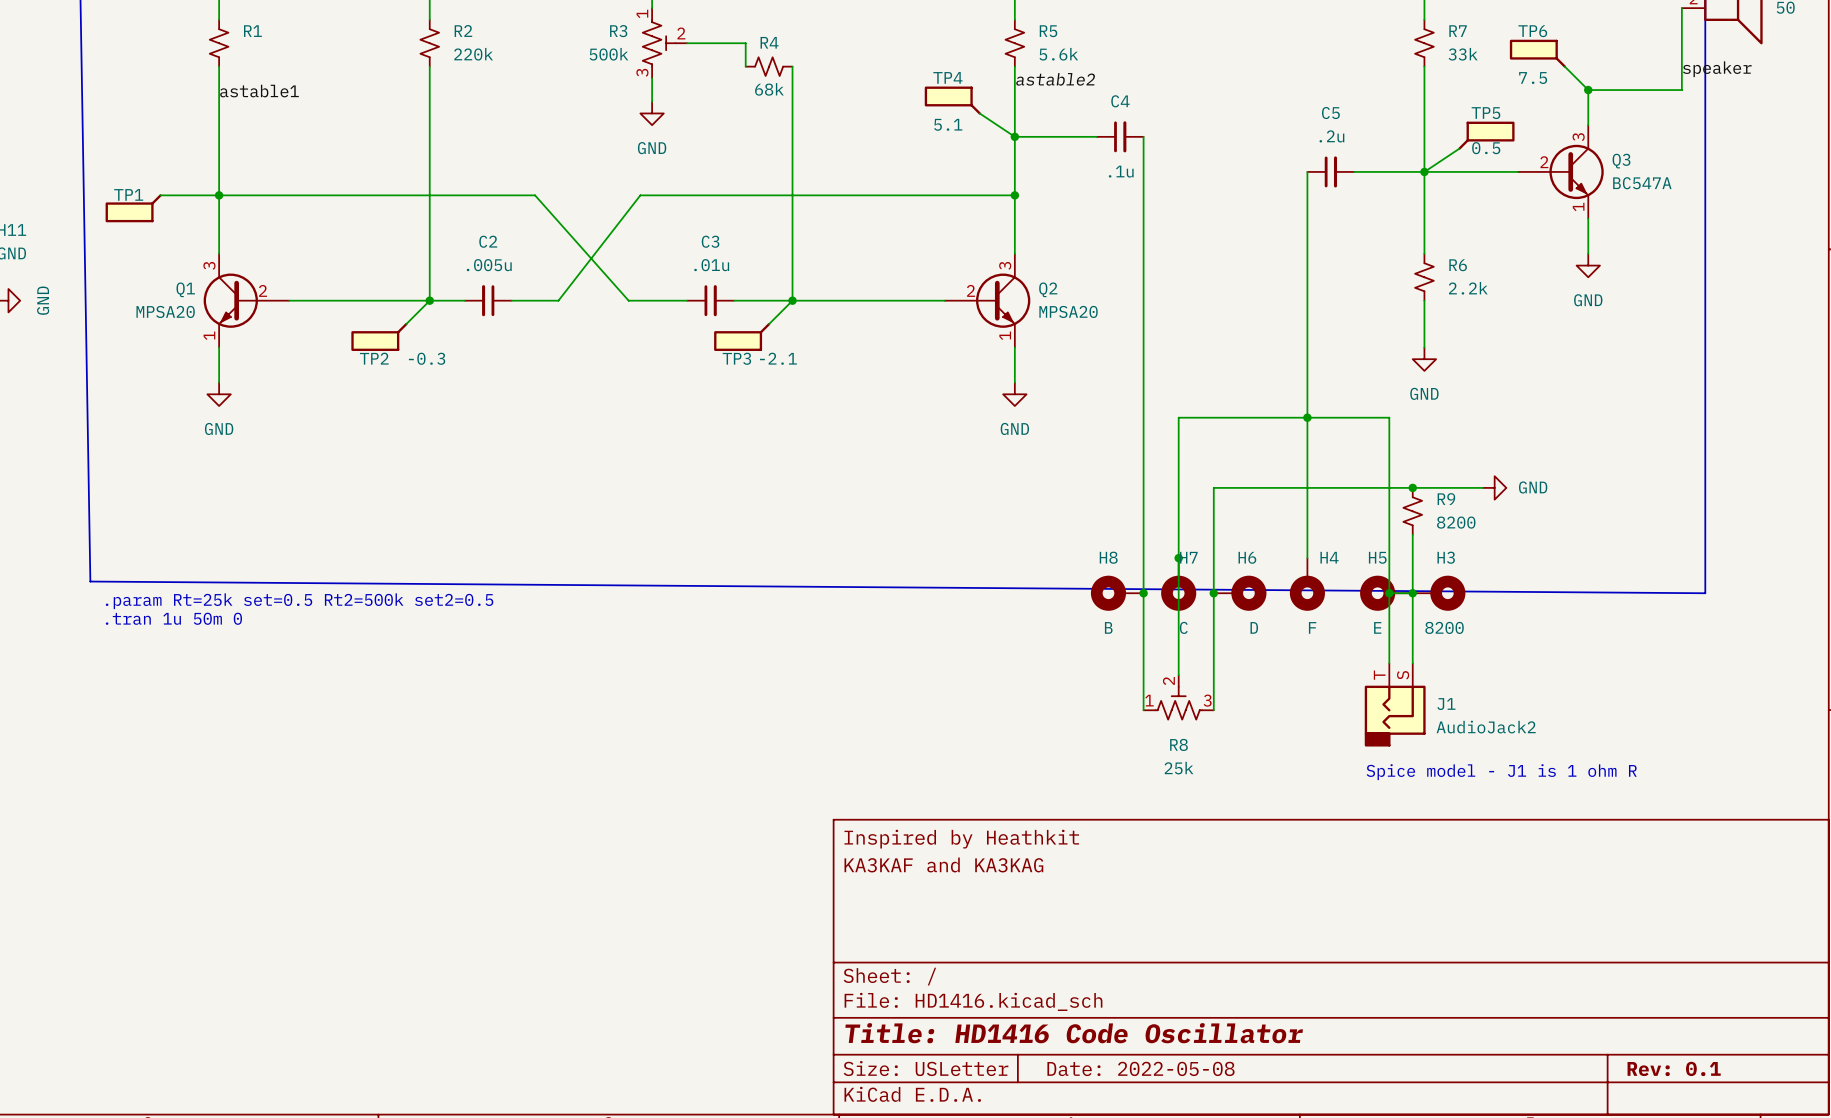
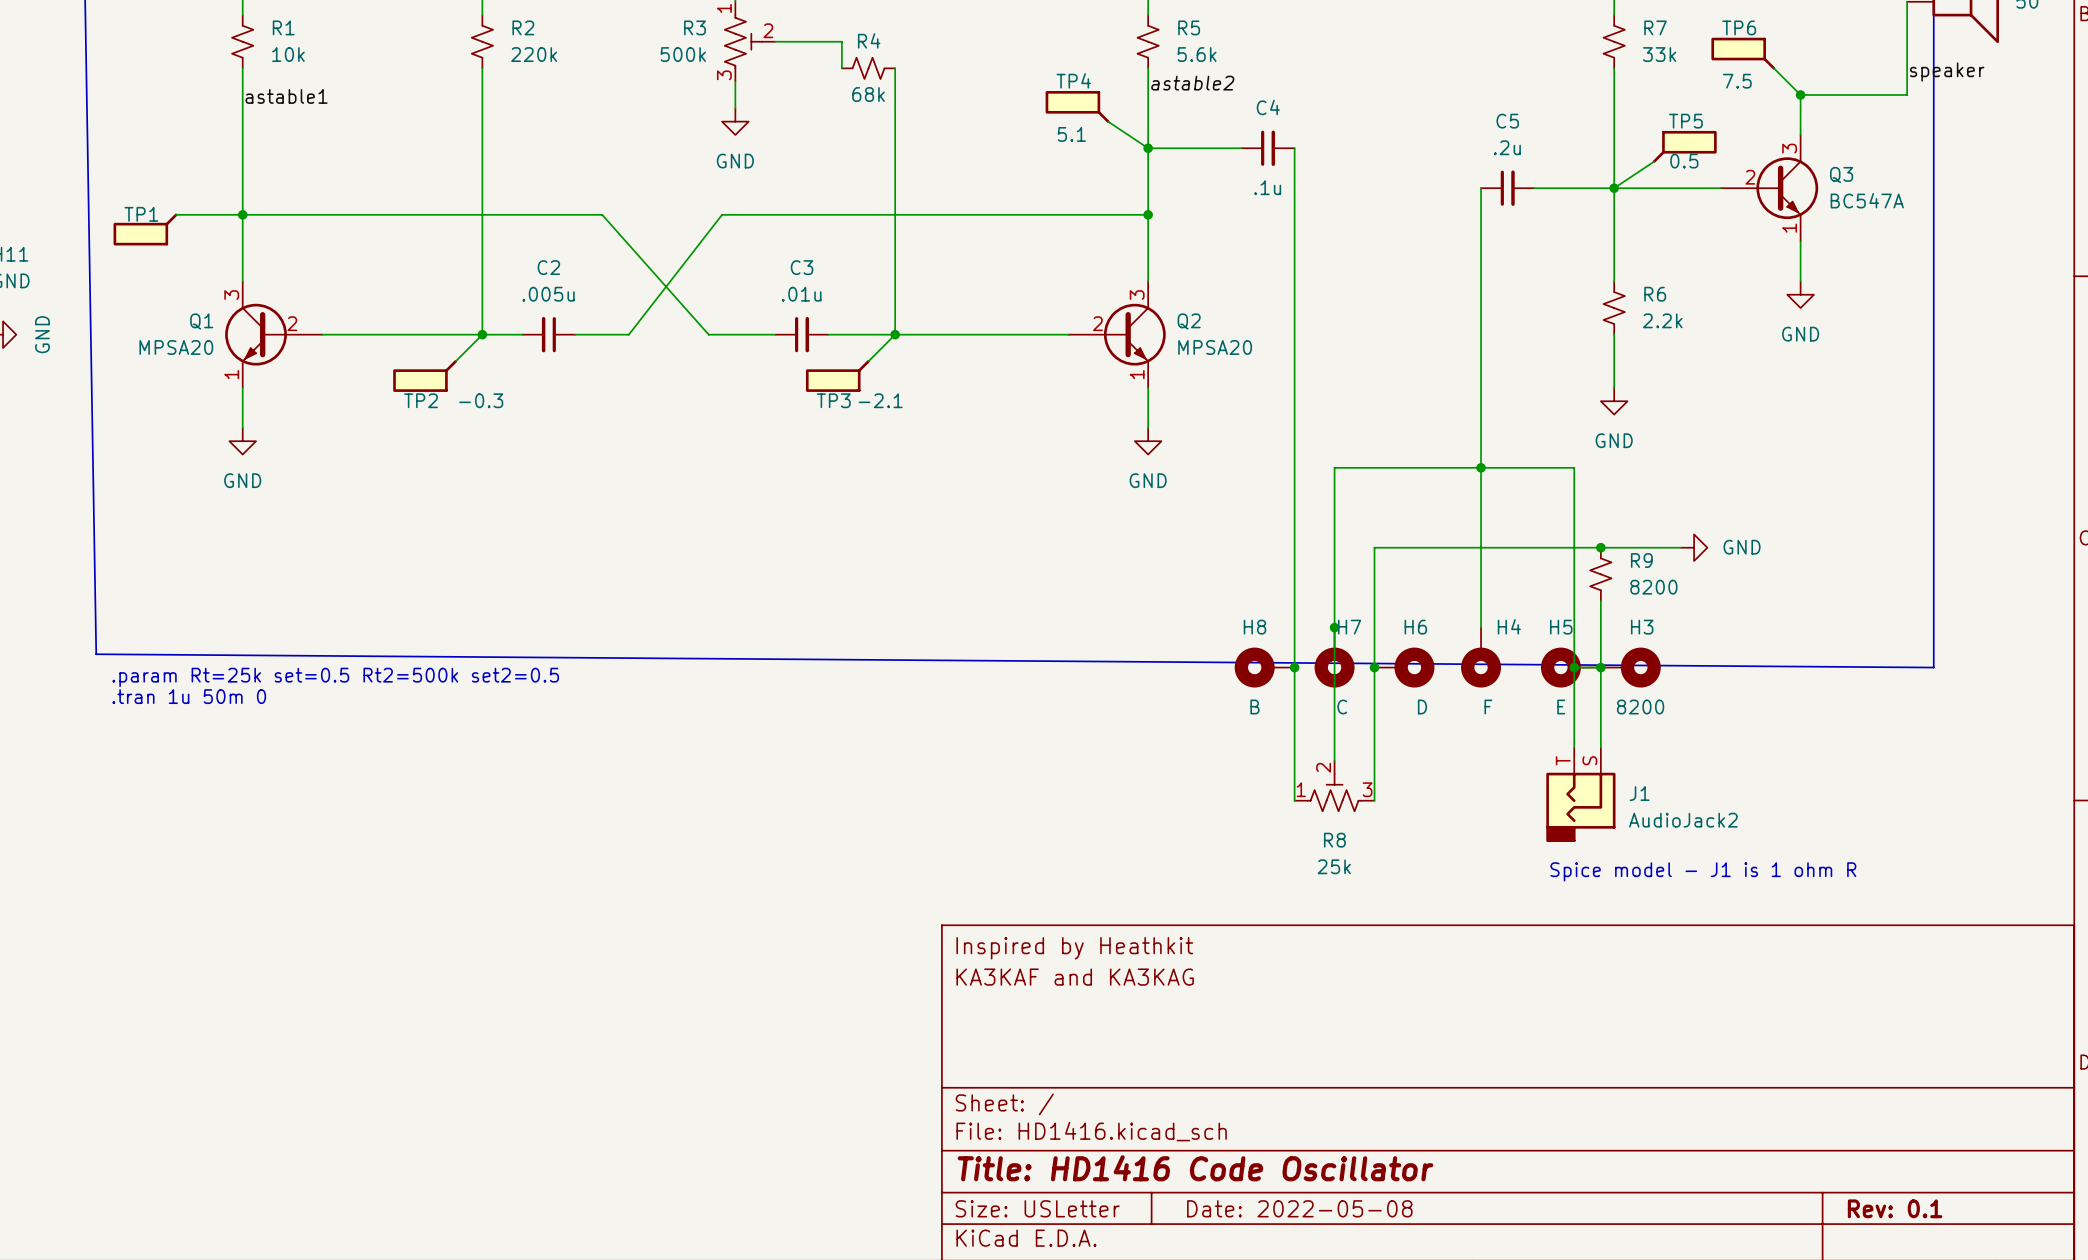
R1 value: none -> 10k (288, 54)

